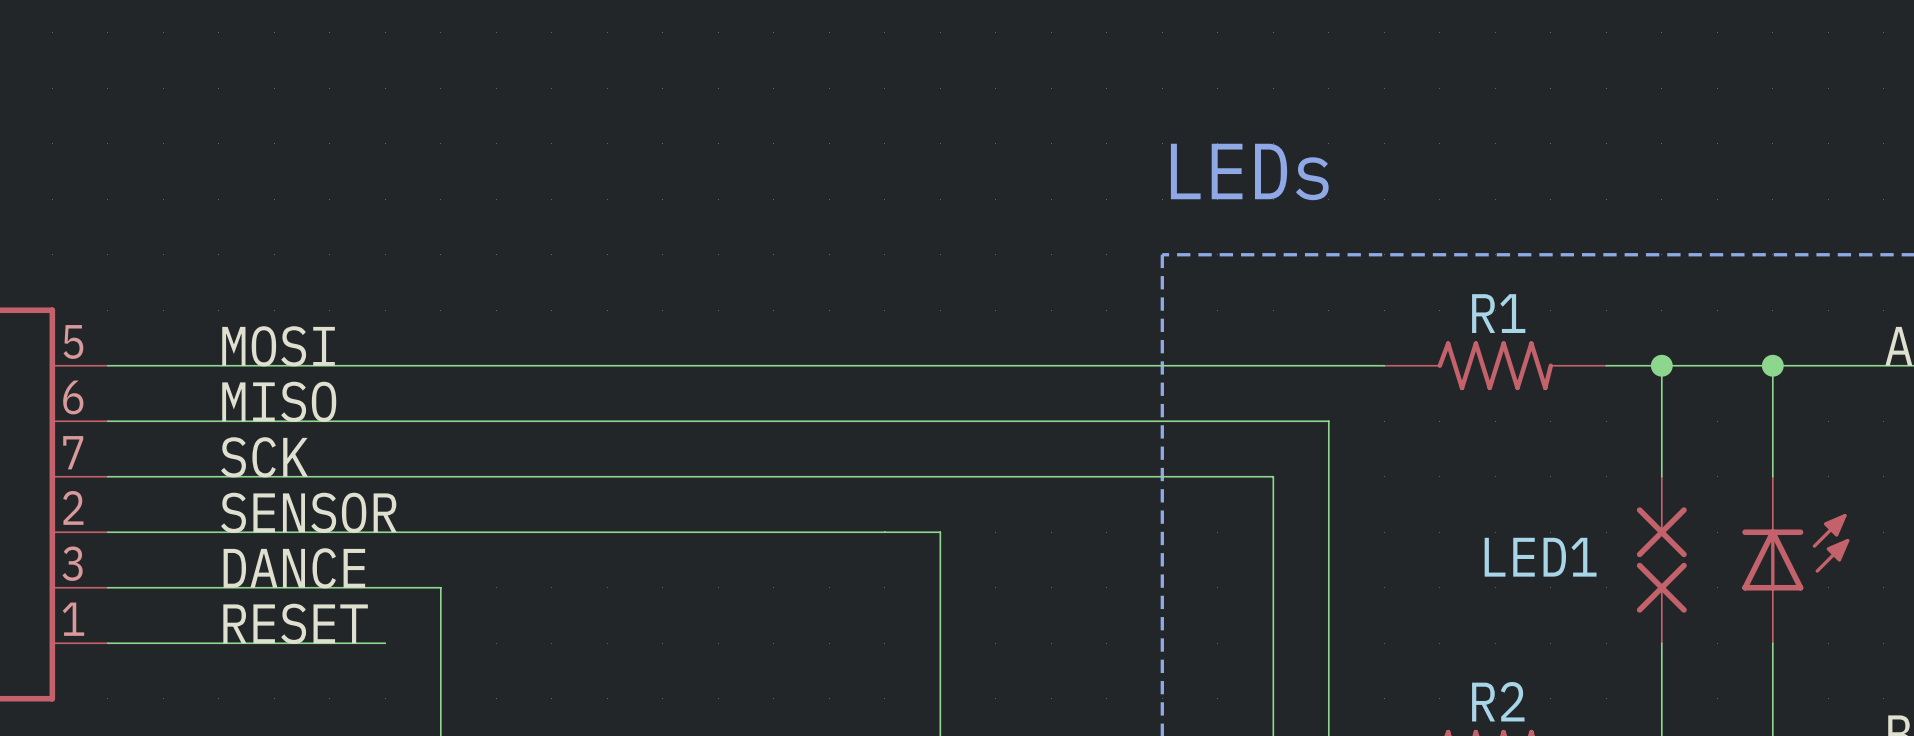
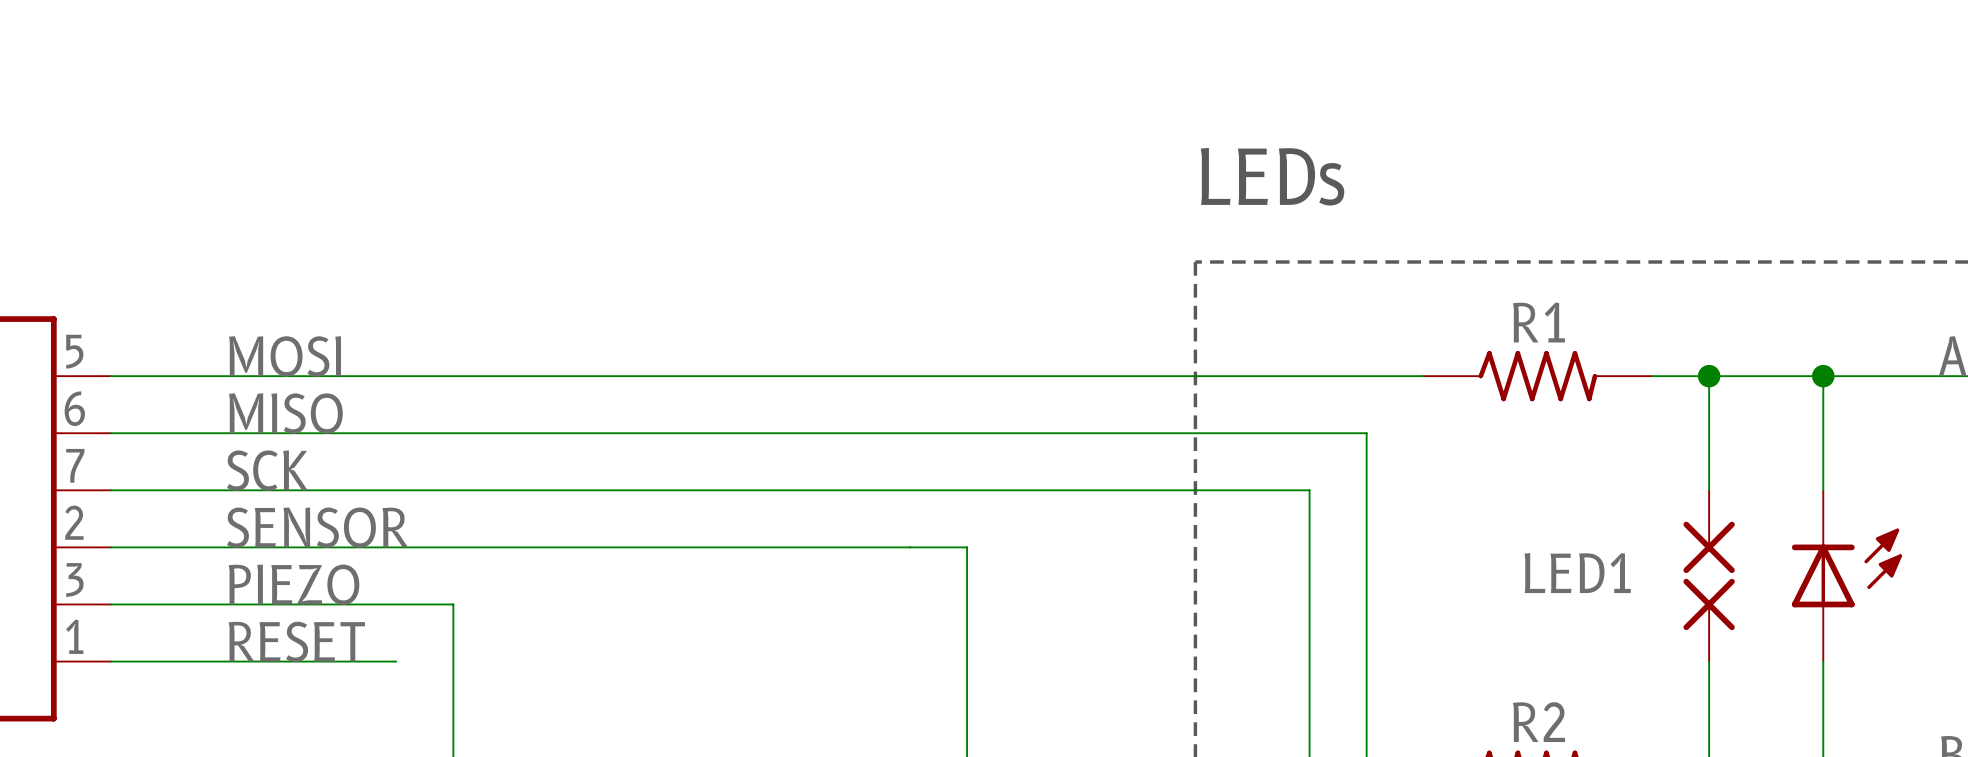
label: DANCE (294, 568) -> PIEZO (294, 584)

